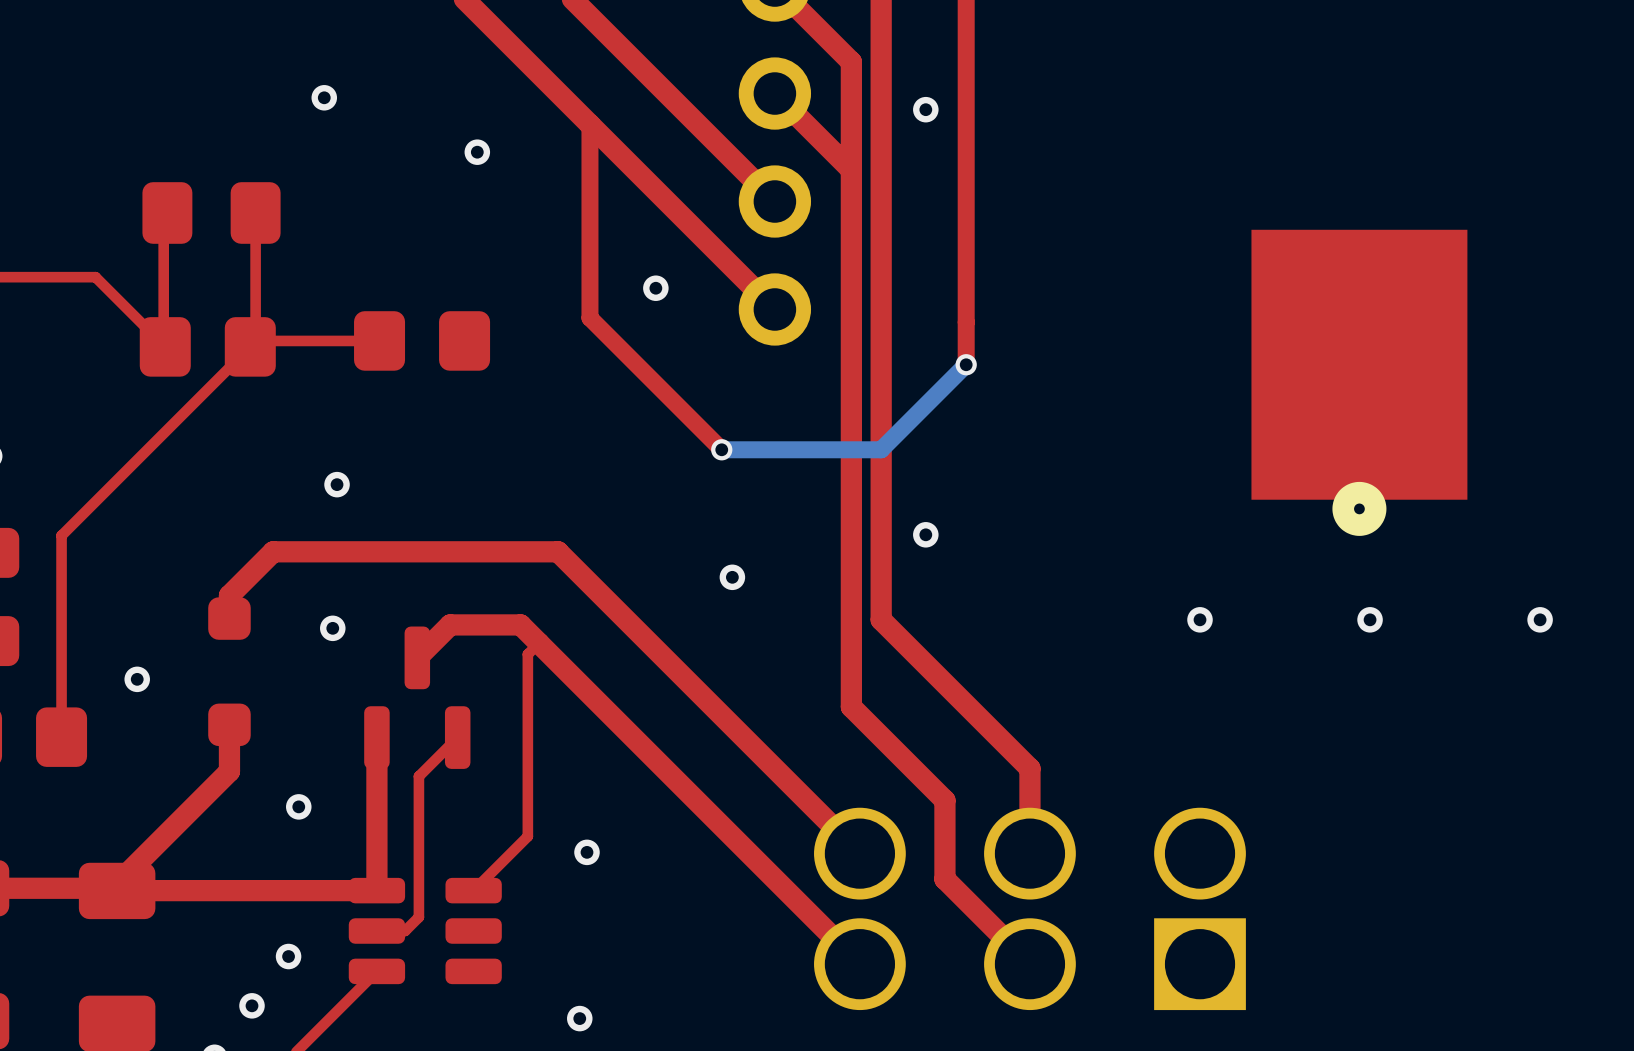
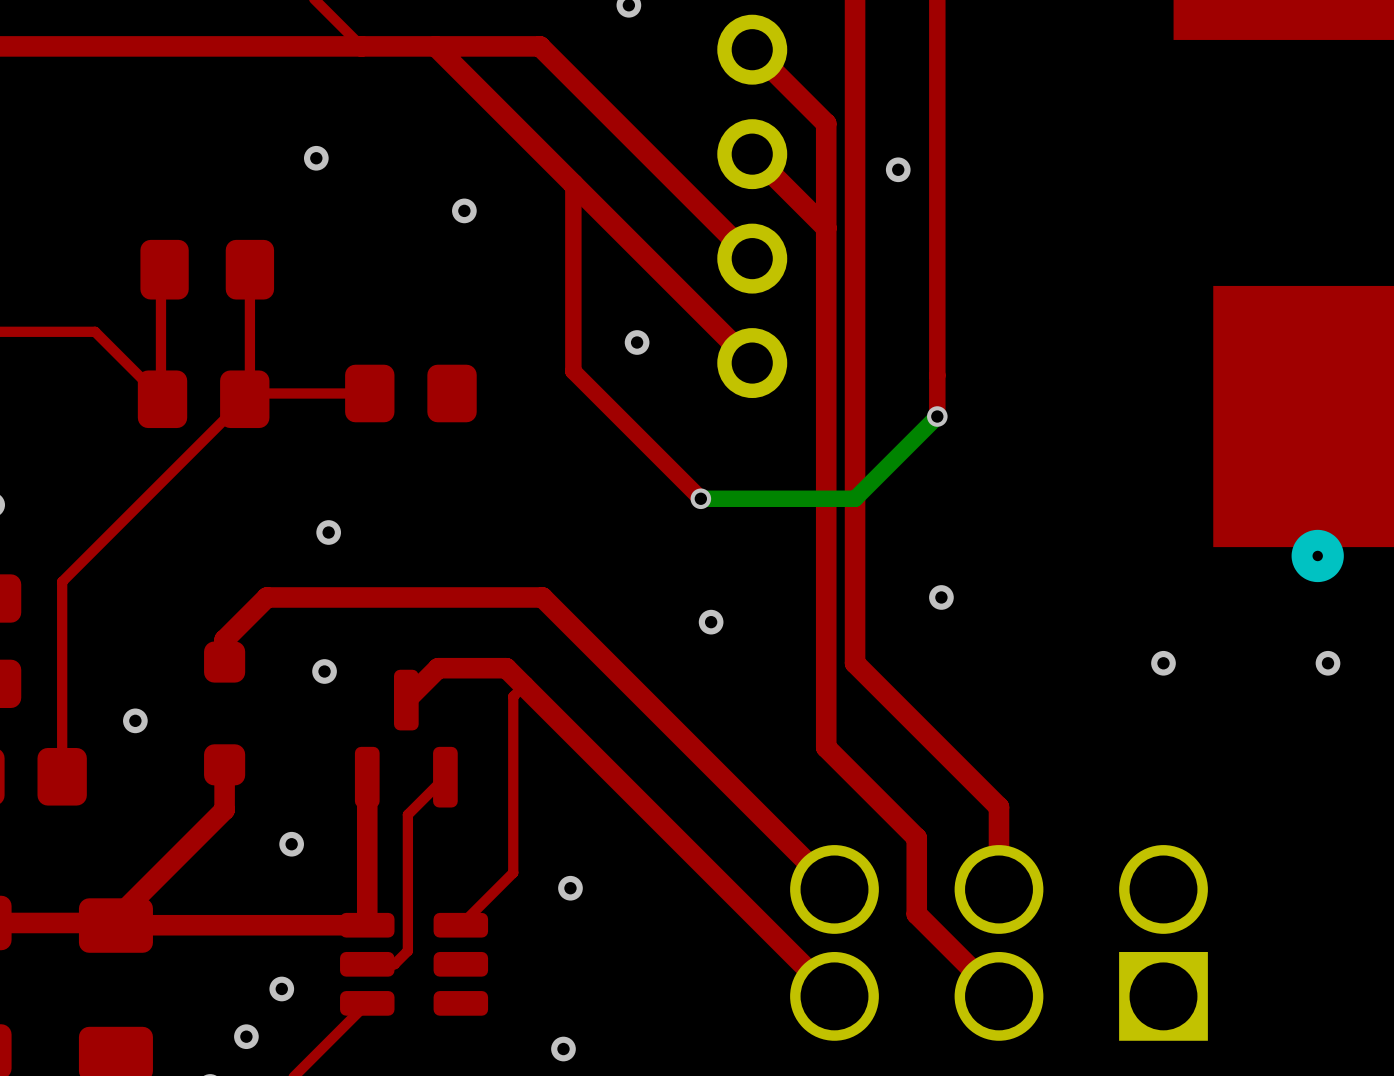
via position: (925, 534) -> (941, 597)

